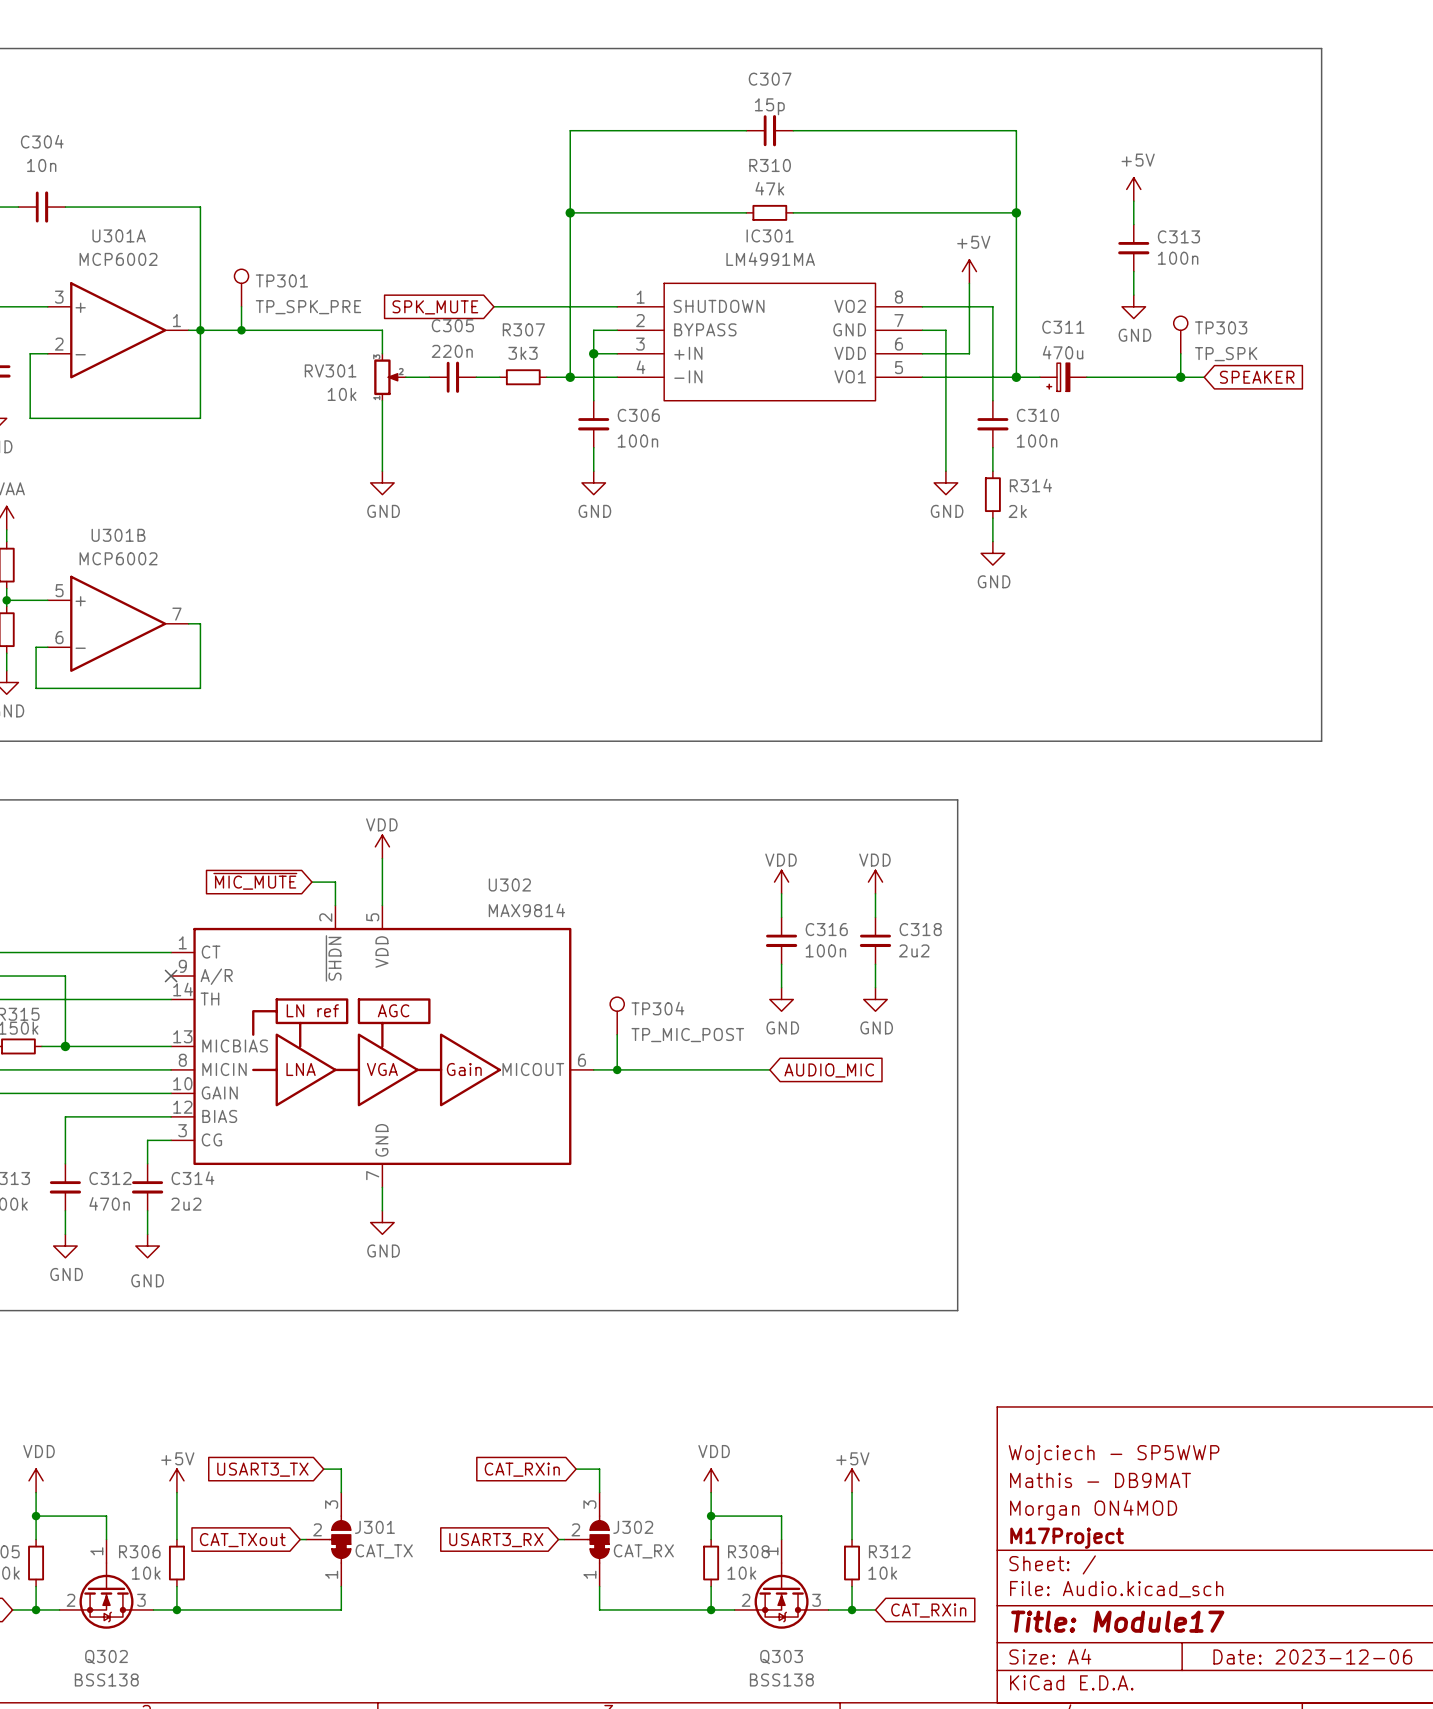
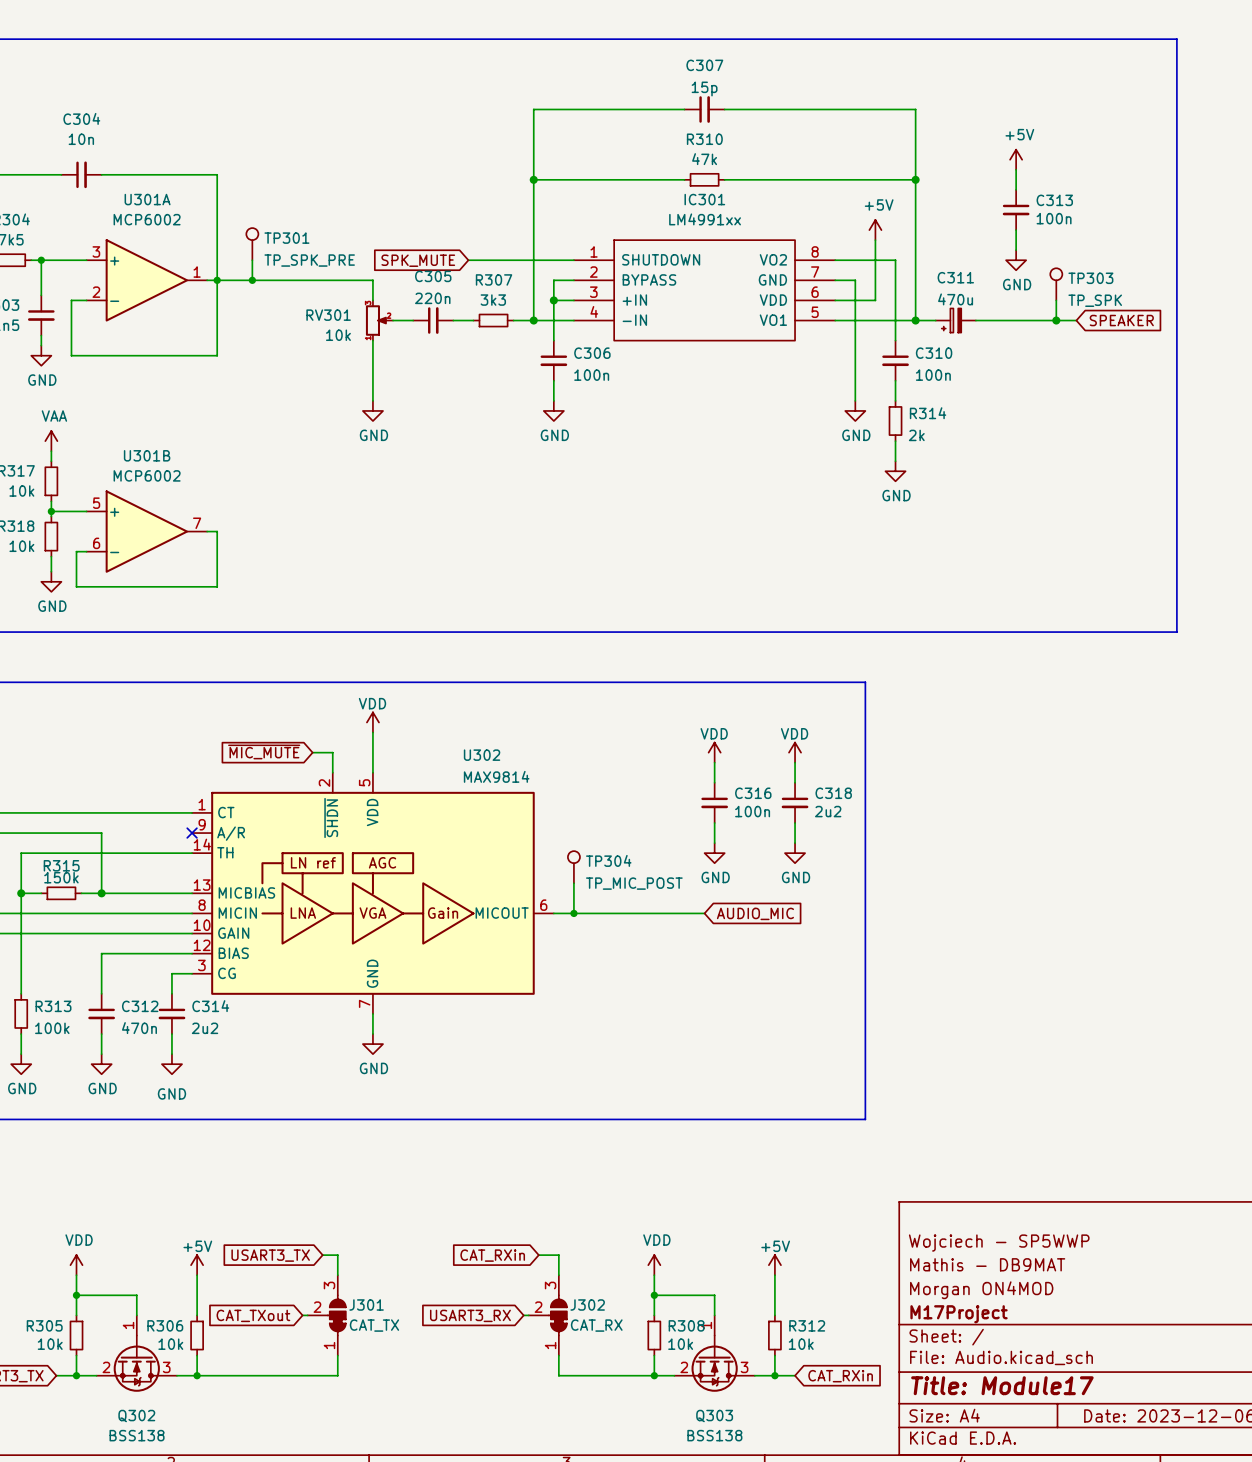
IC301 value: LM4991MA (770, 259) -> LM4991xx (705, 219)

